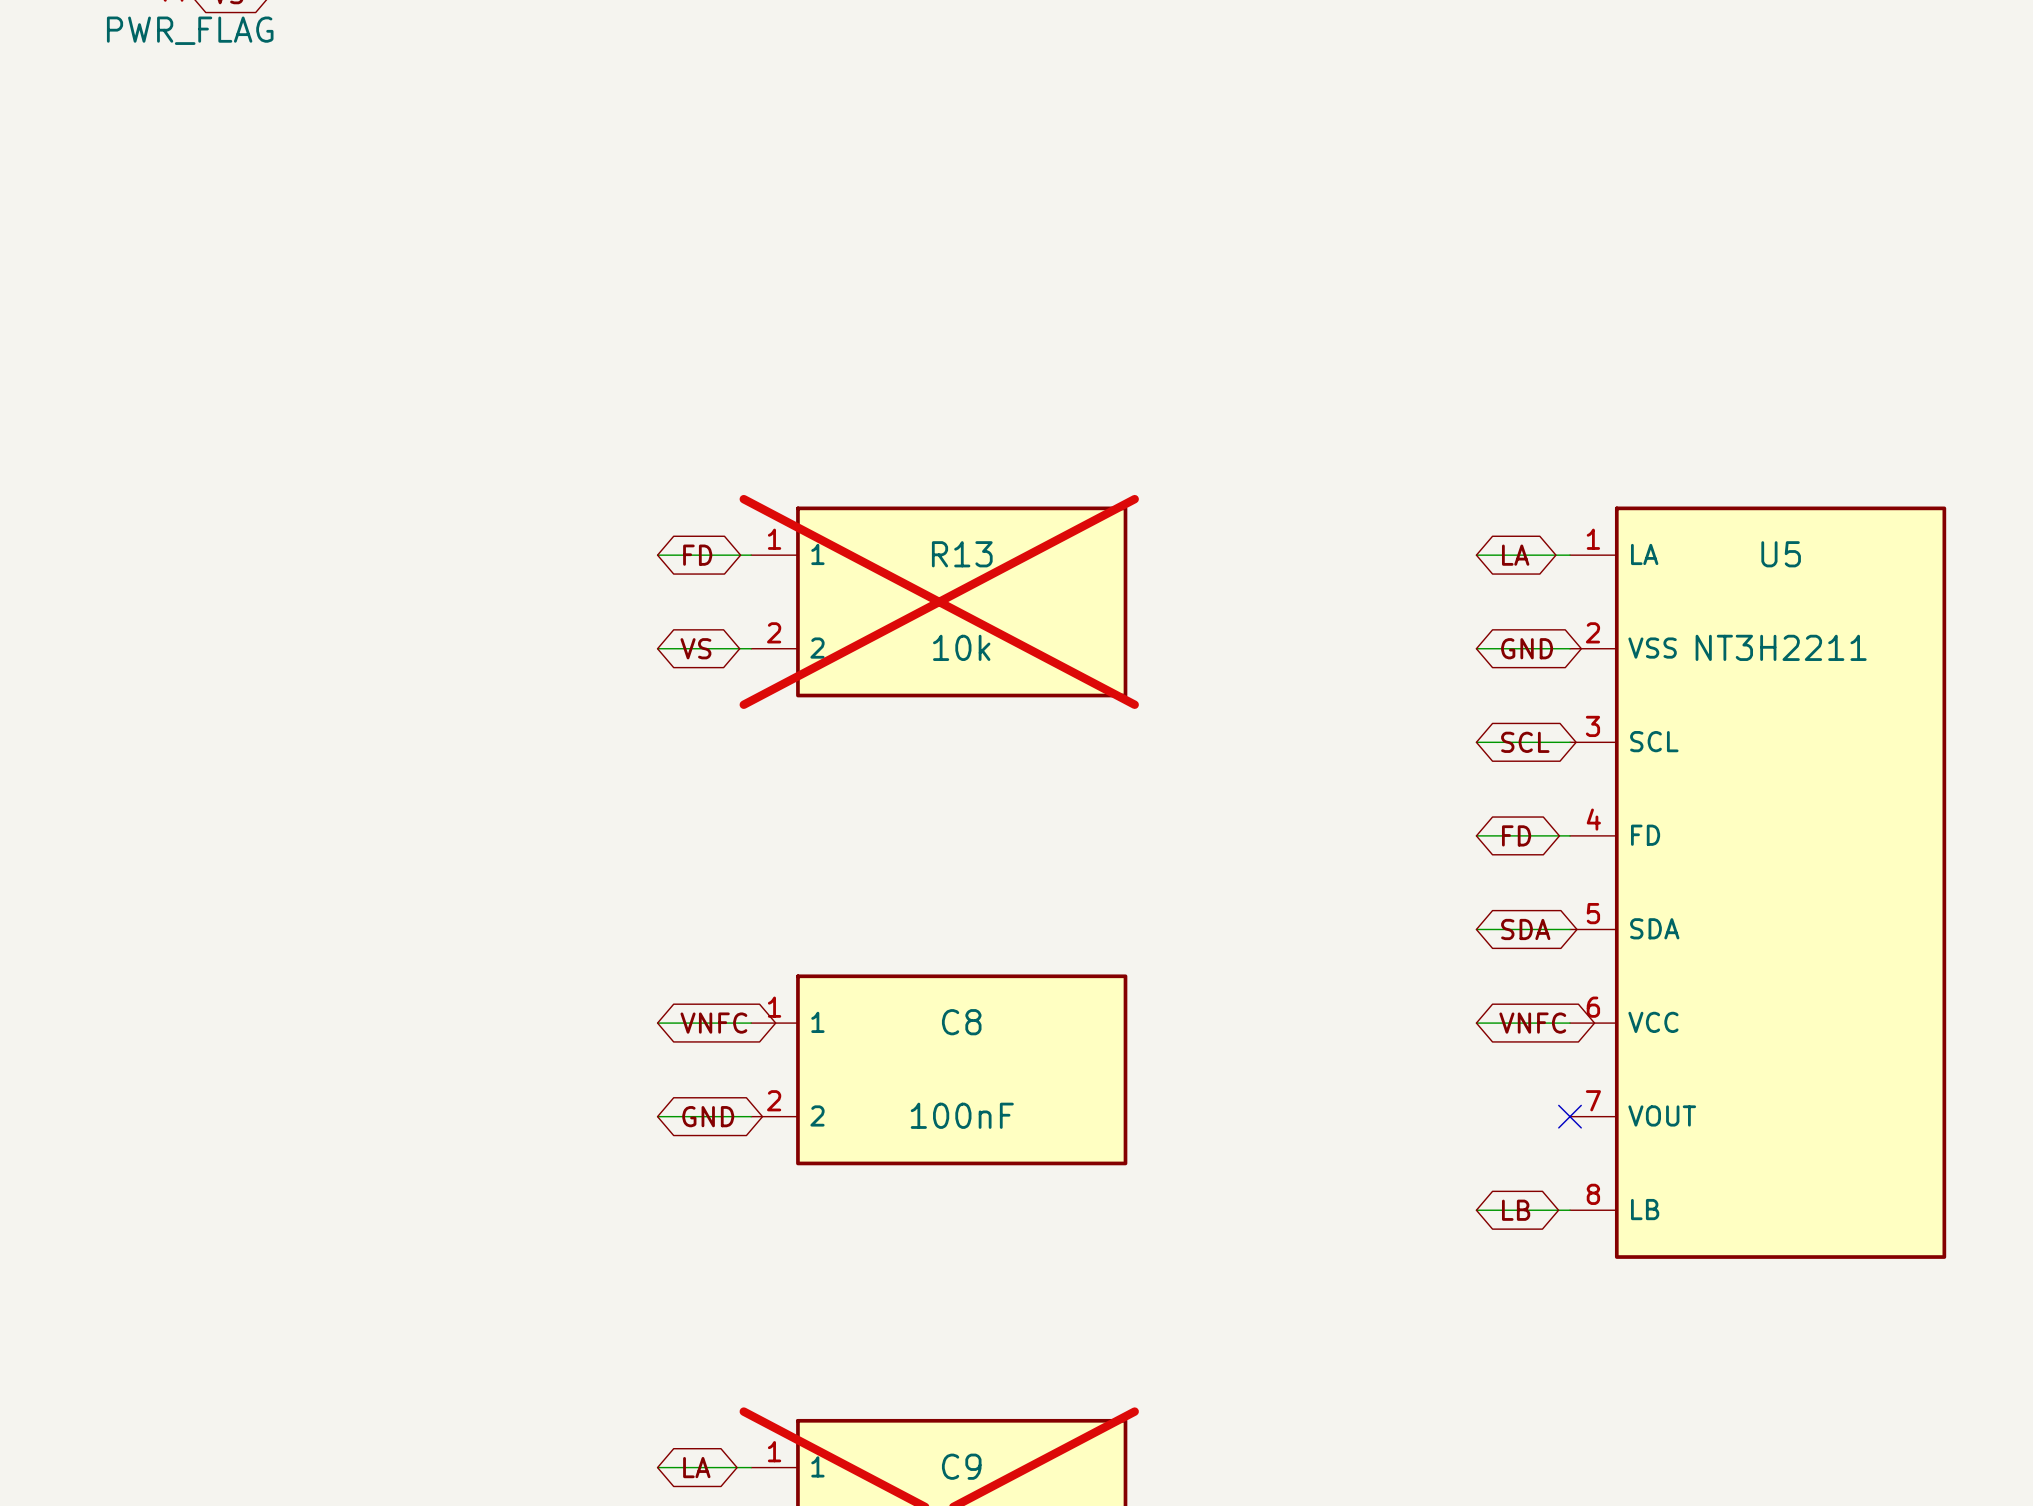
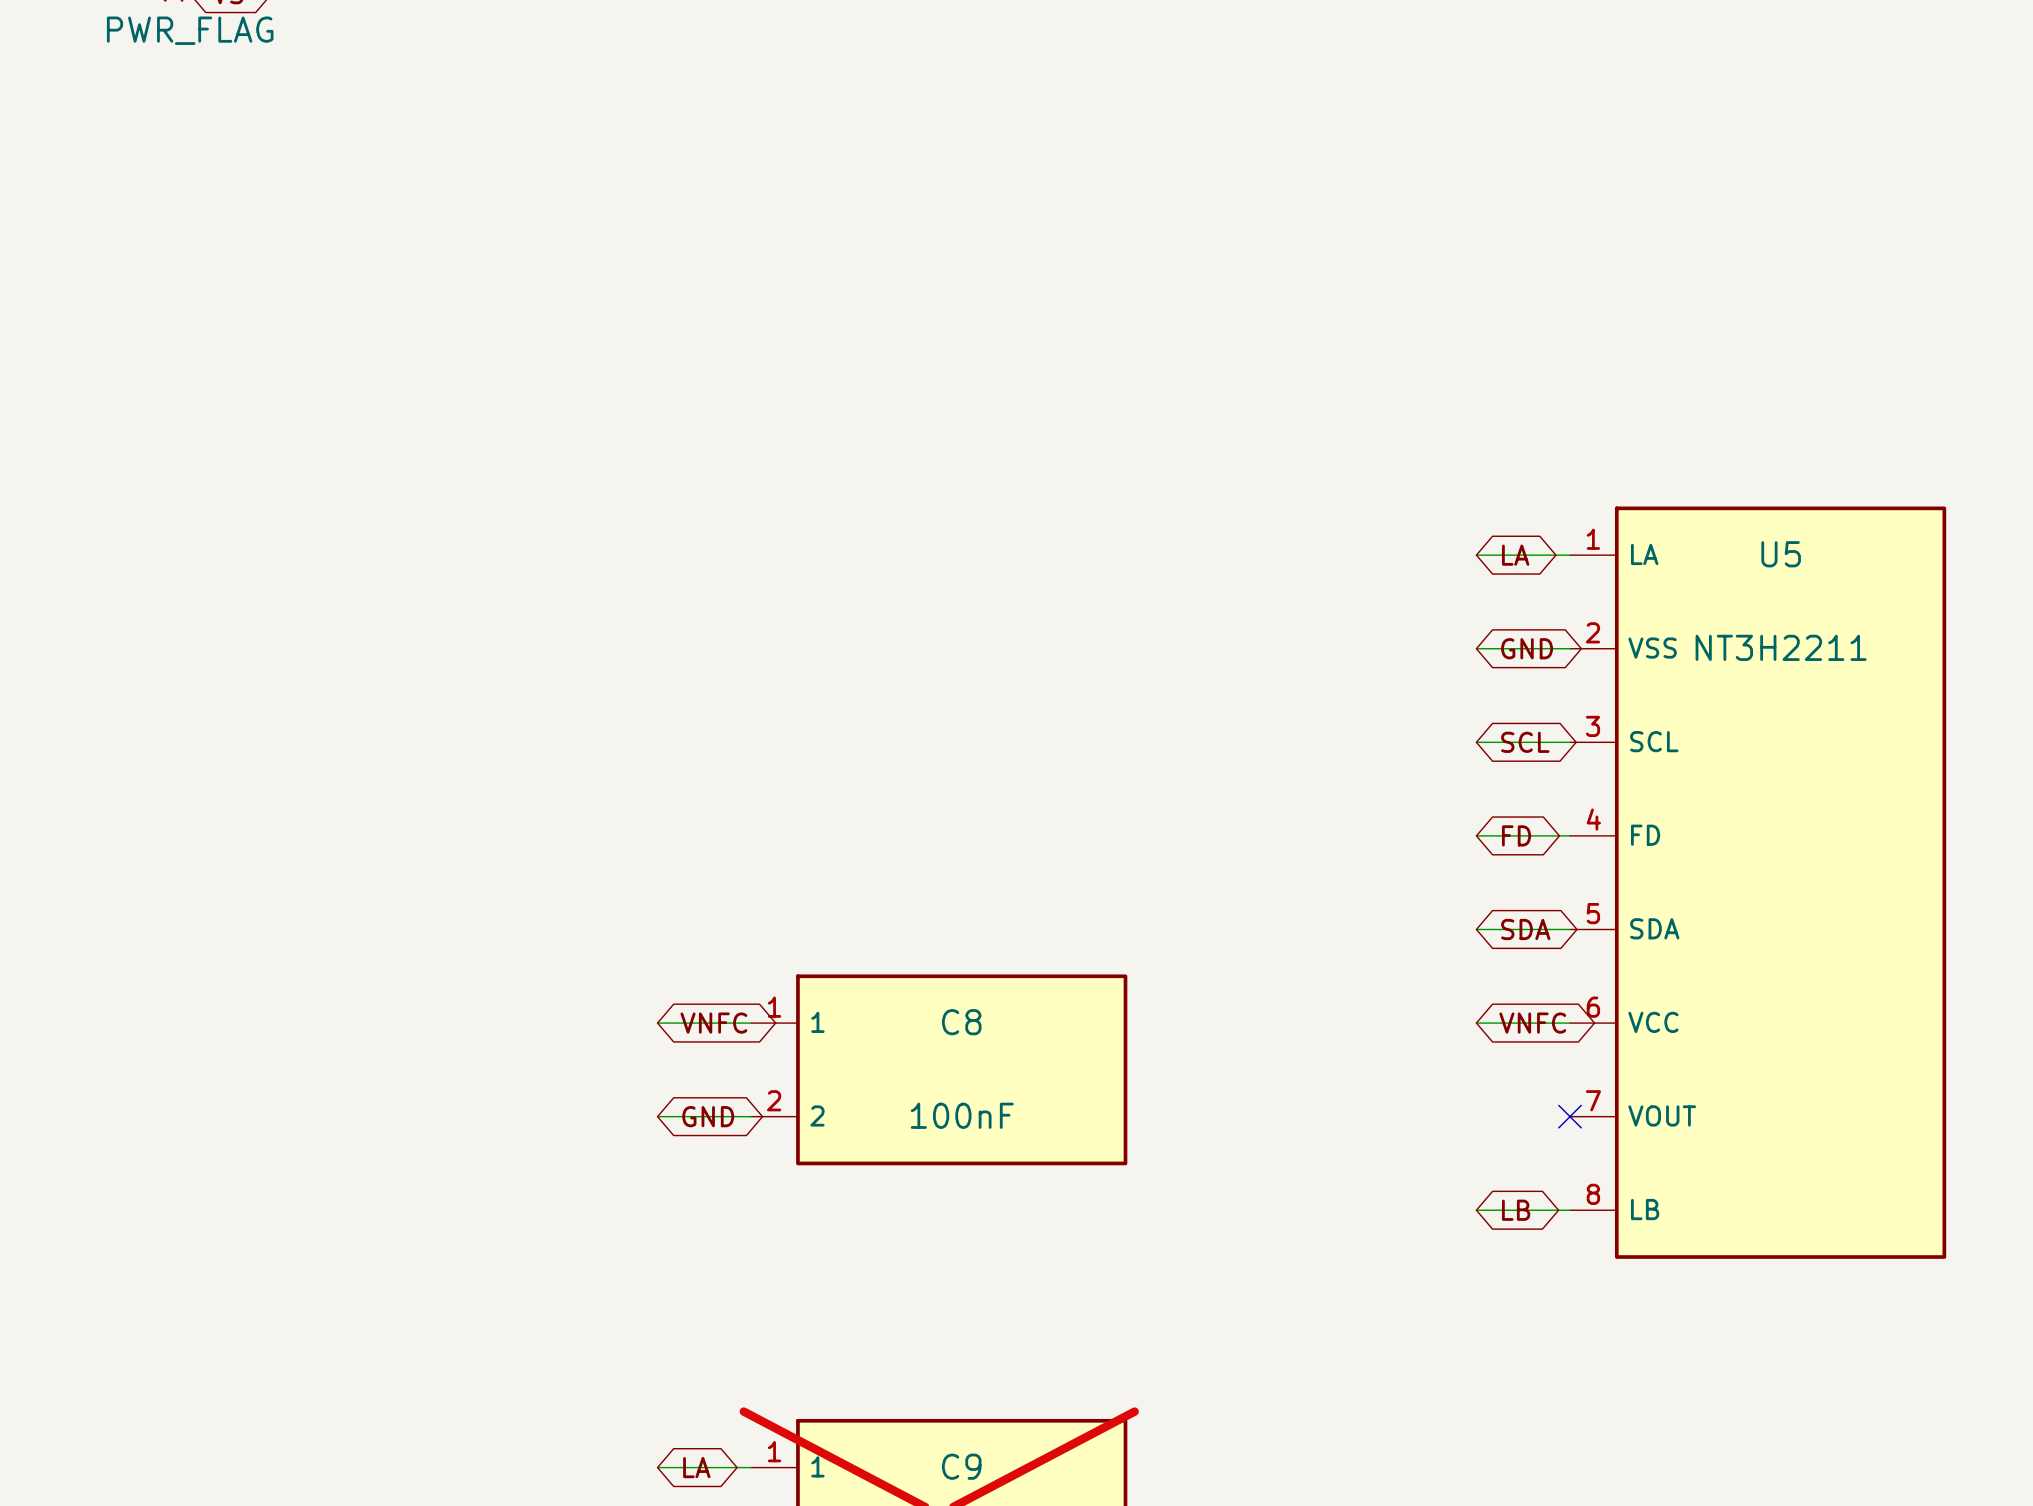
wire: (657, 555) (751, 555) -> none
global label: FD (697, 555) -> none
R13: 10k (939, 601) -> none
wire: (657, 648) (751, 648) -> none
global label: VS (695, 648) -> none

